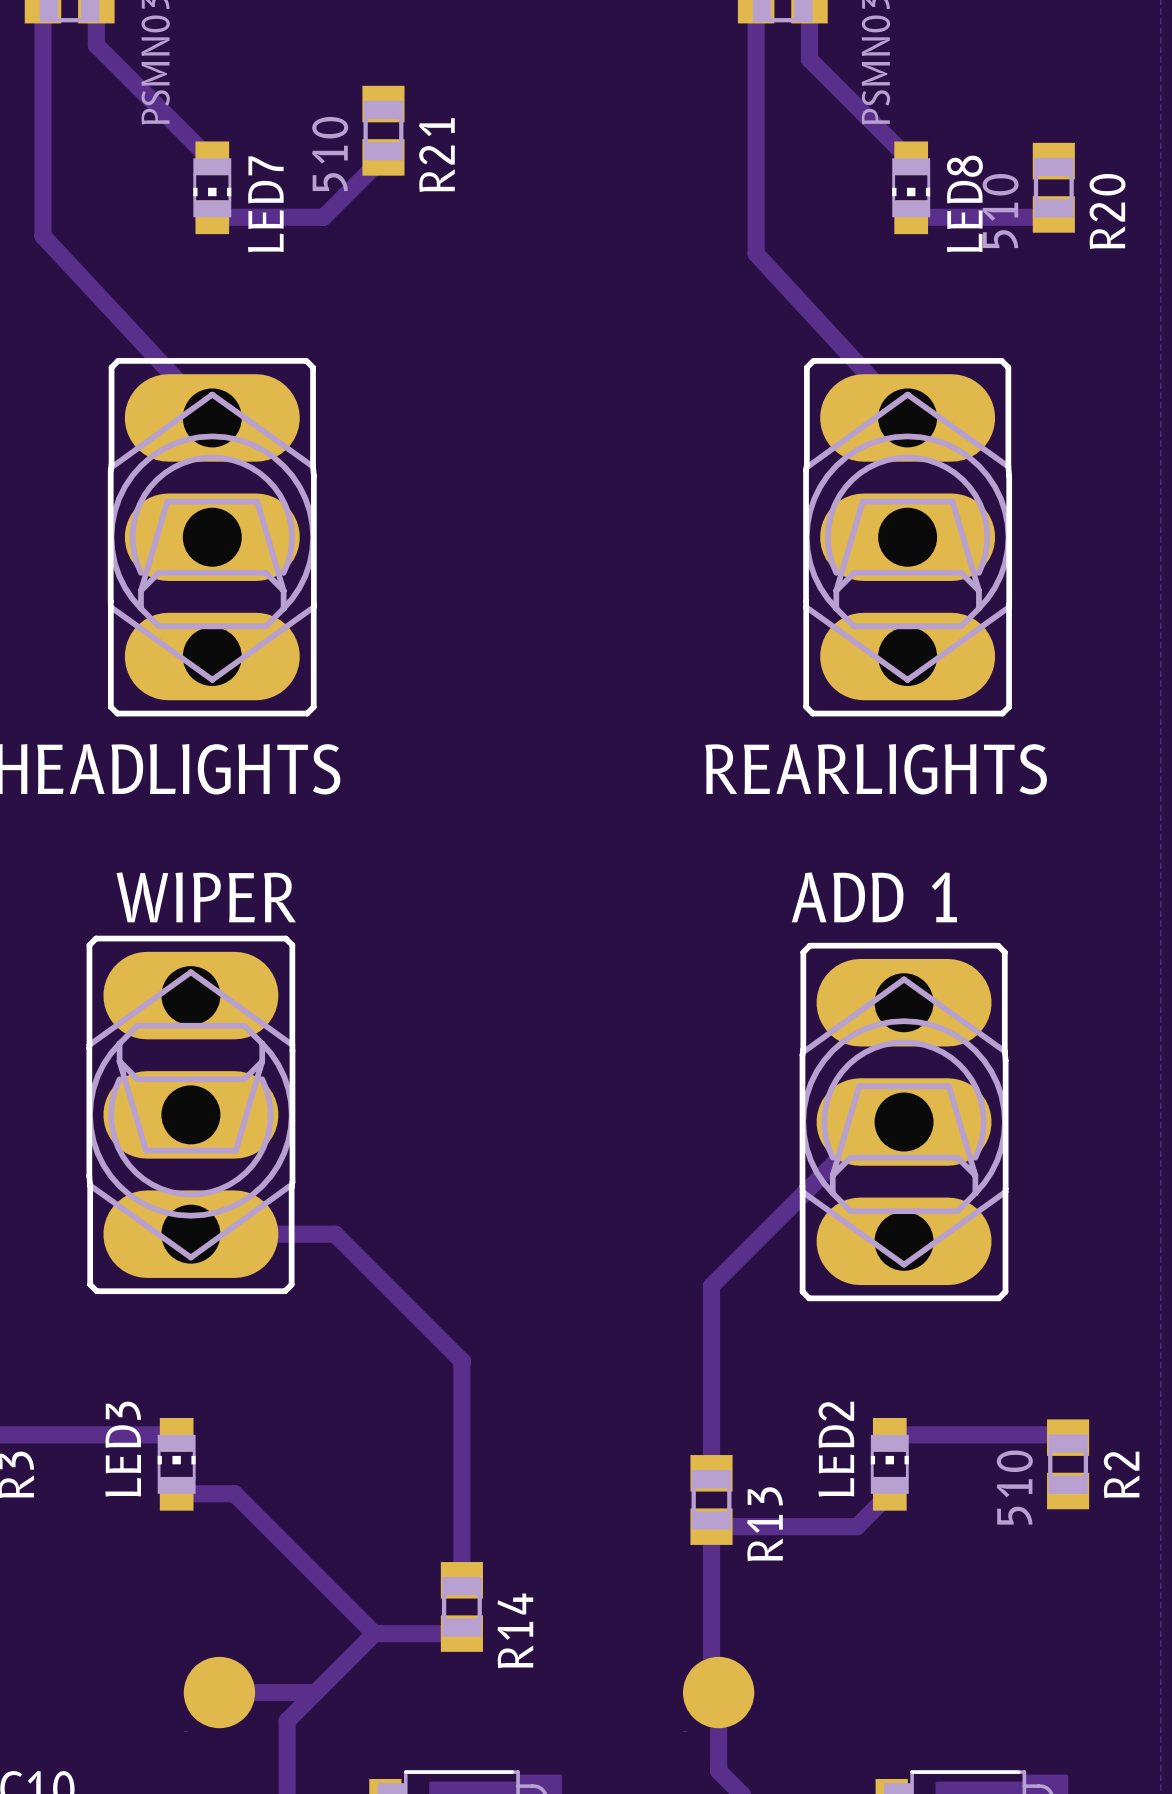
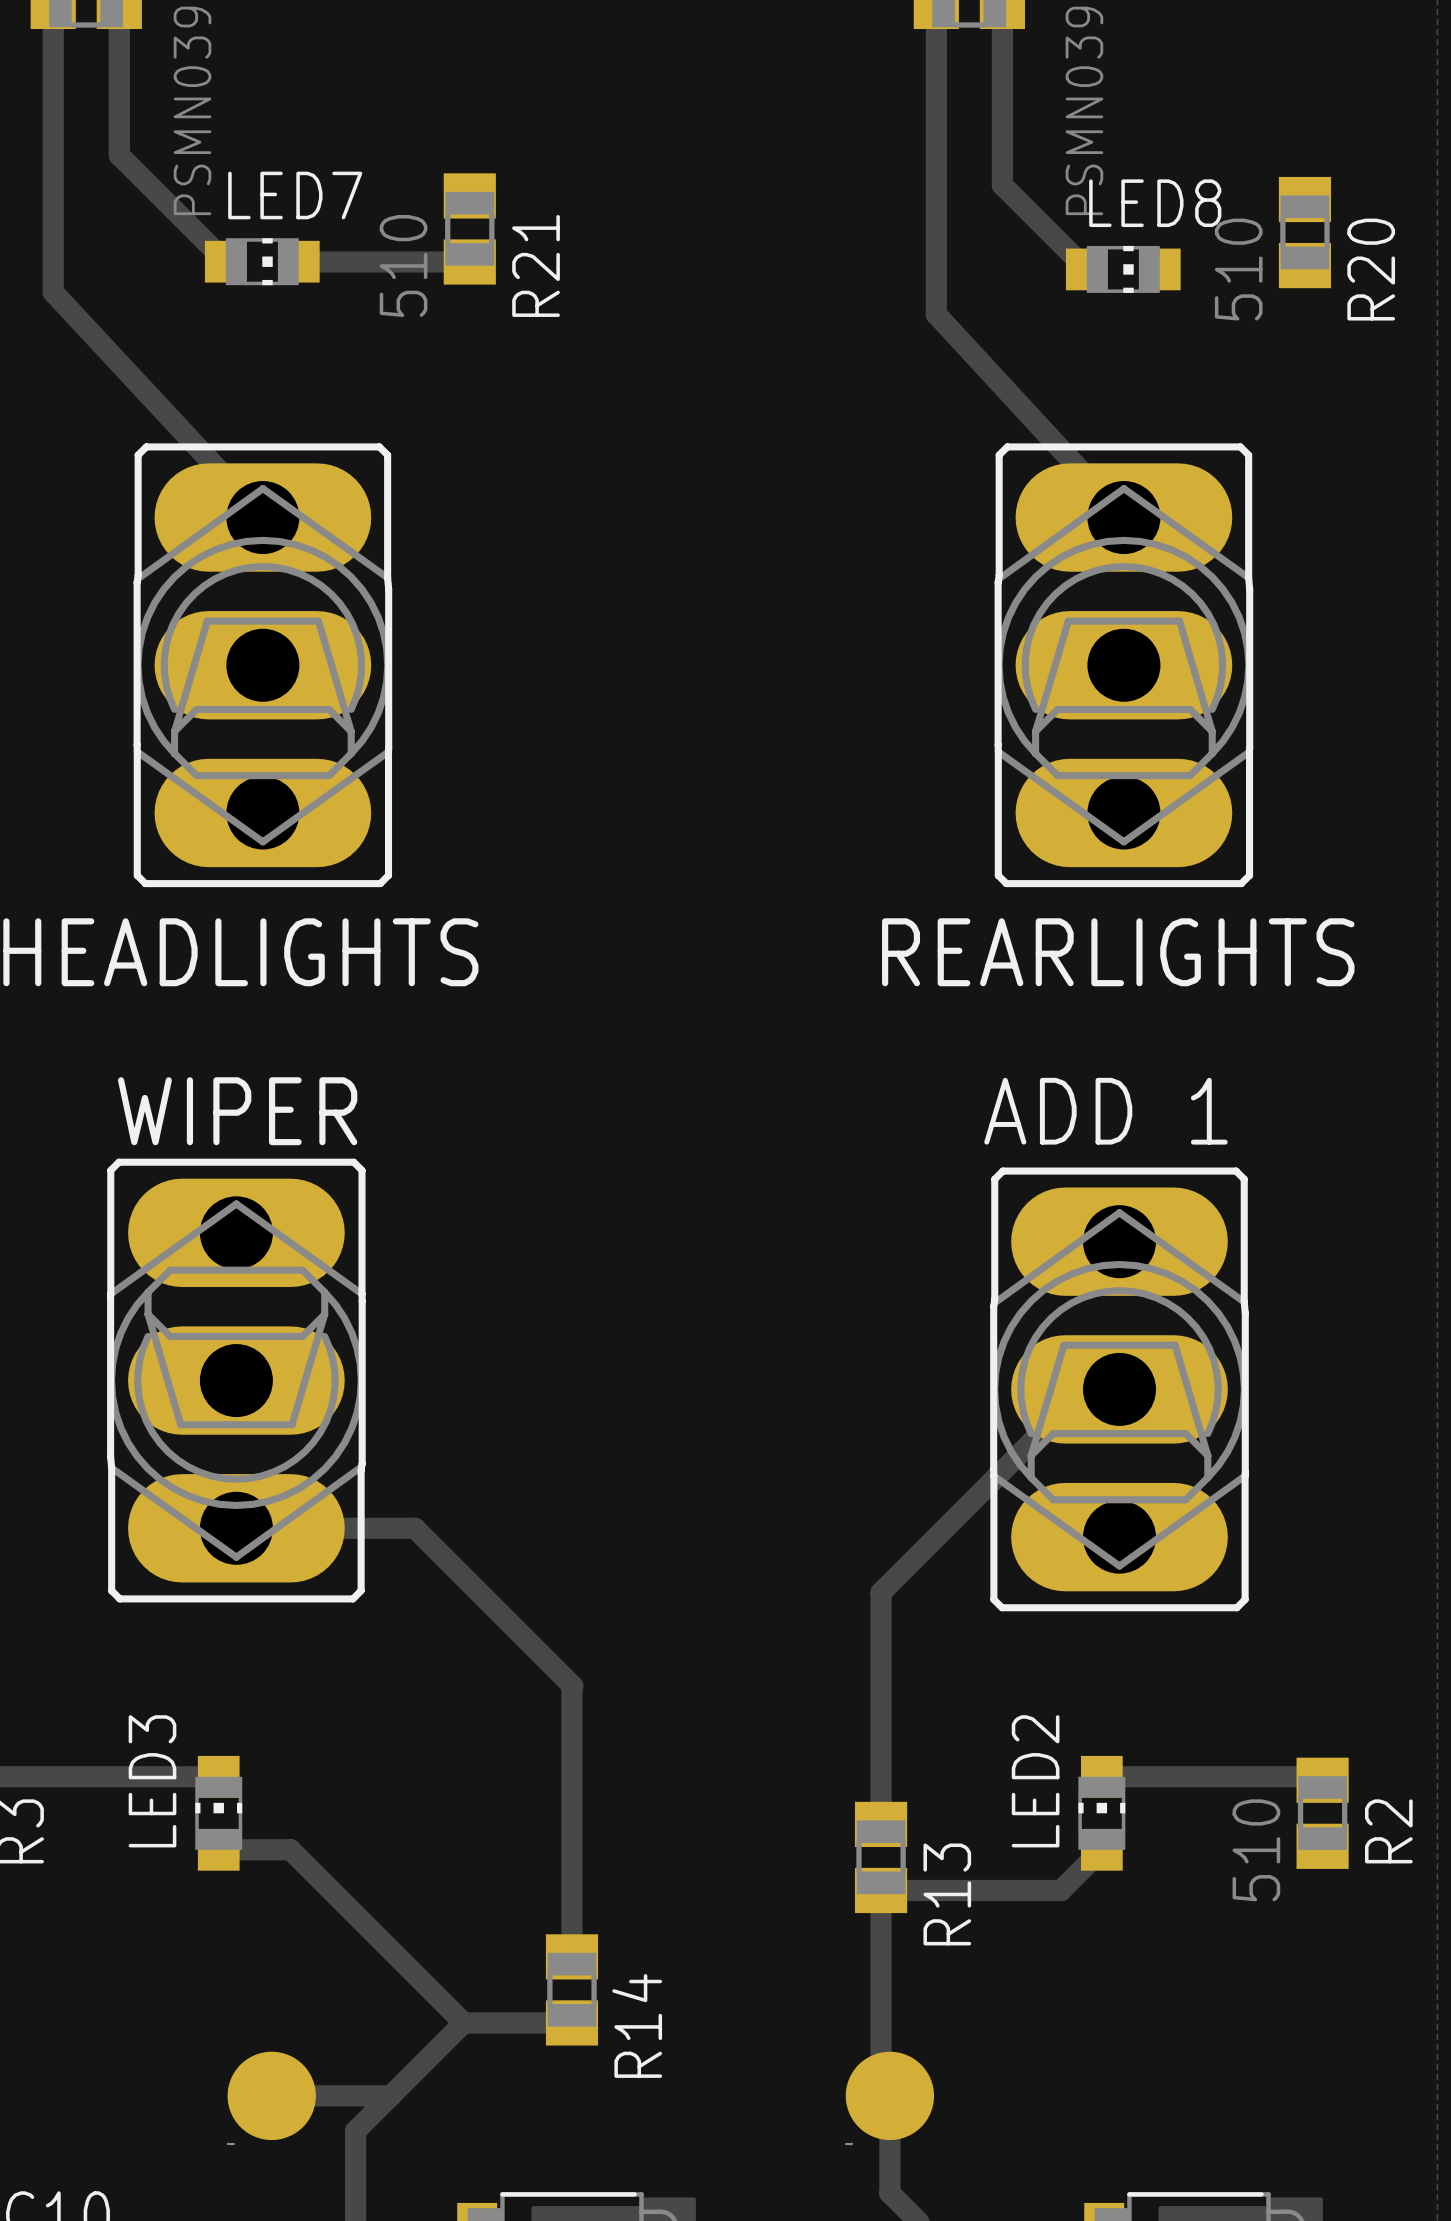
track: (96, 45) (209, 158) (212, 158) -> (119, 55) (119, 155) (225, 261)
track: (809, 59) (908, 158) (911, 158) -> (1002, 73) (1002, 185) (1086, 269)
R21 position: (383, 130) -> (469, 228)
track: (383, 157) (323, 217) (212, 217) -> none
LED7 rotation: 0° (212, 187) -> 90° counterclockwise (262, 261)
LED8 rotation: 0° (911, 187) -> 90° counterclockwise (1123, 269)
track: none -> (299, 261) (469, 261)
track: (911, 217) (1051, 217) -> none

